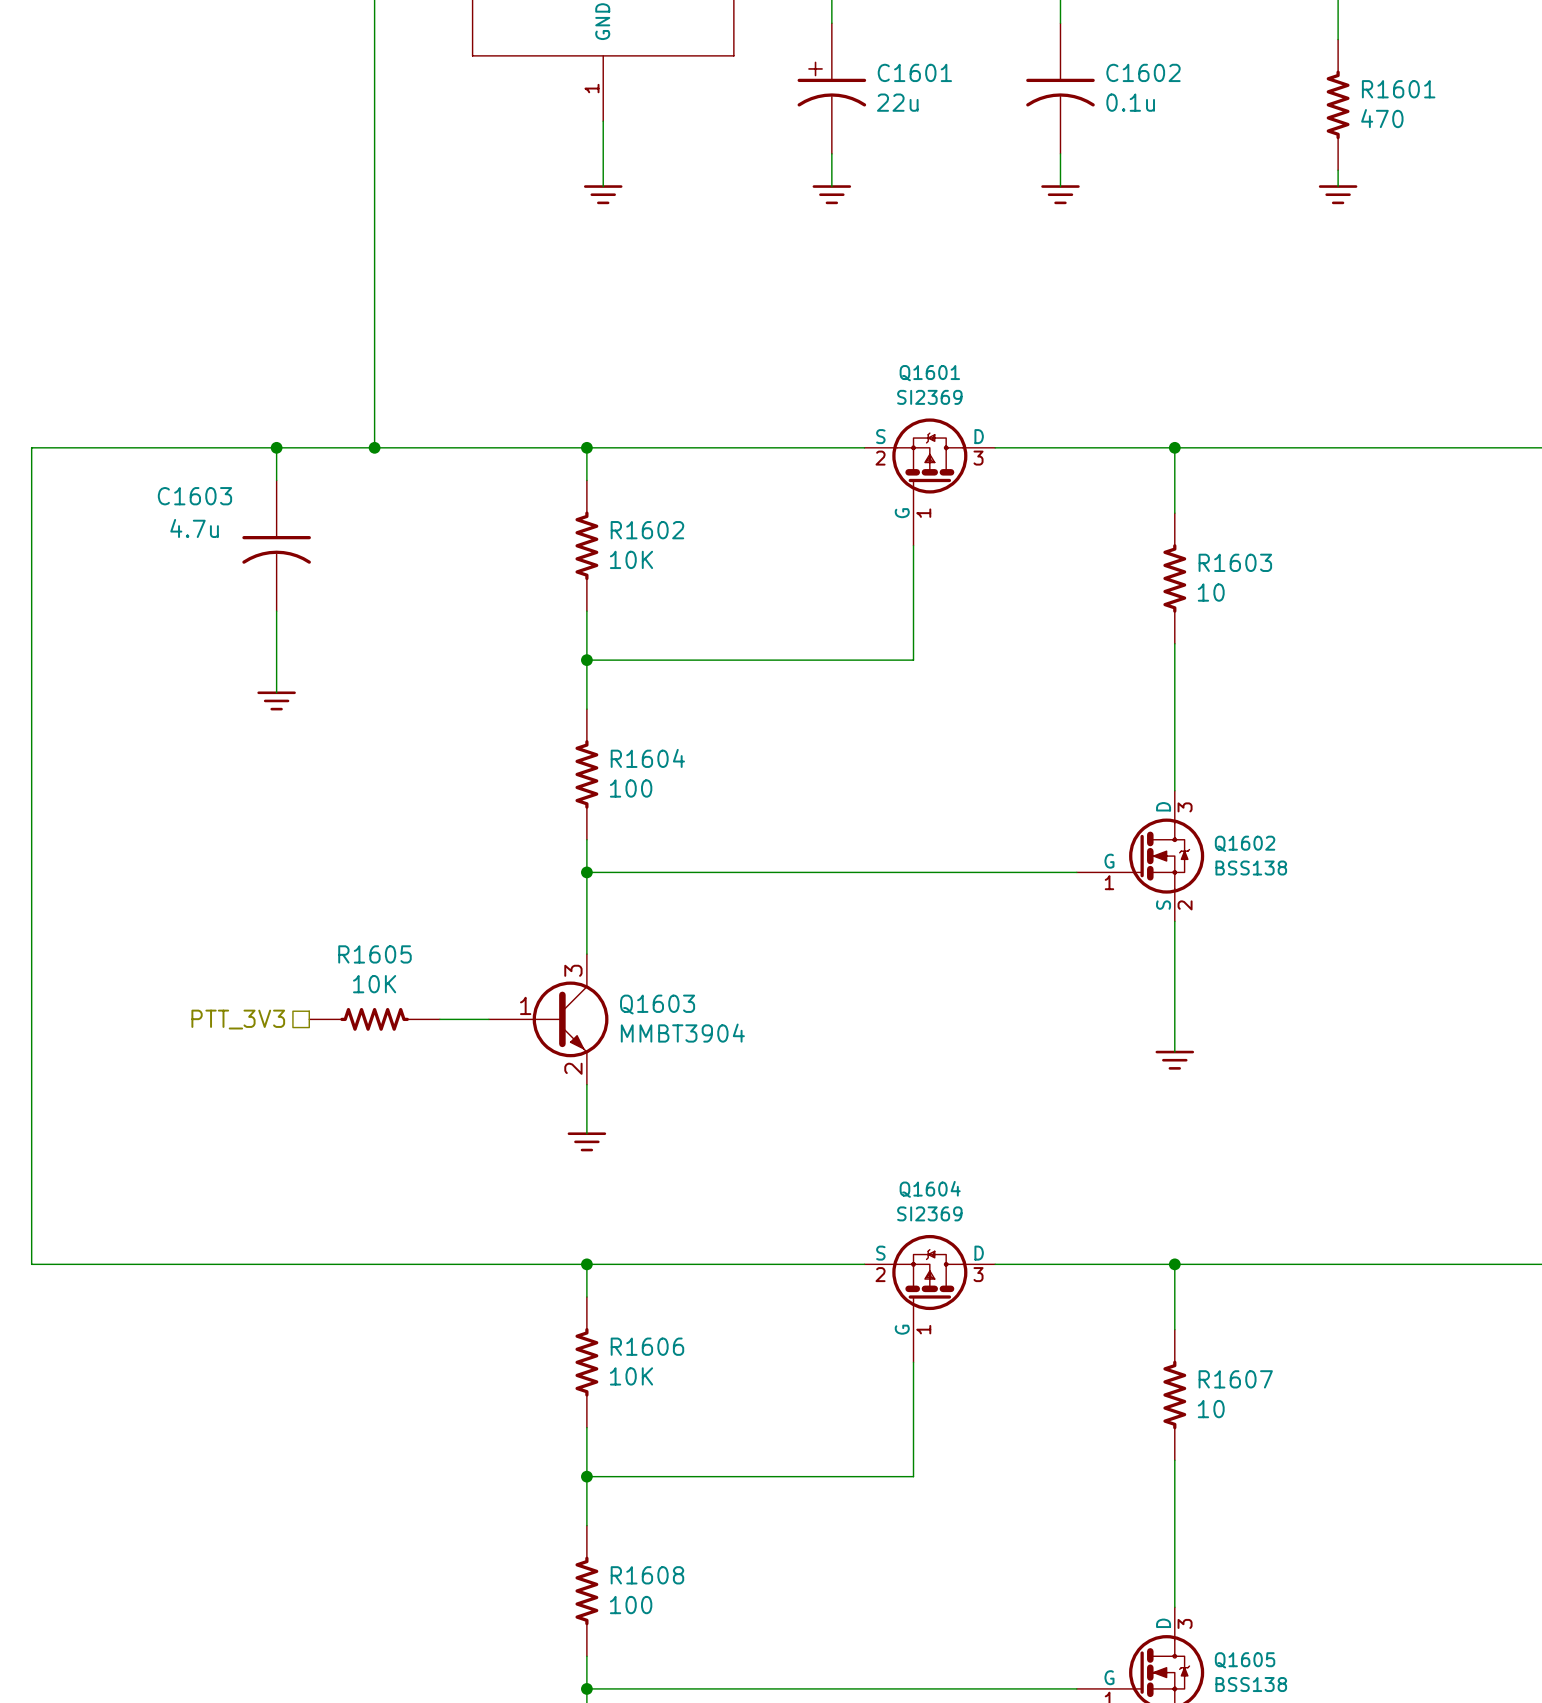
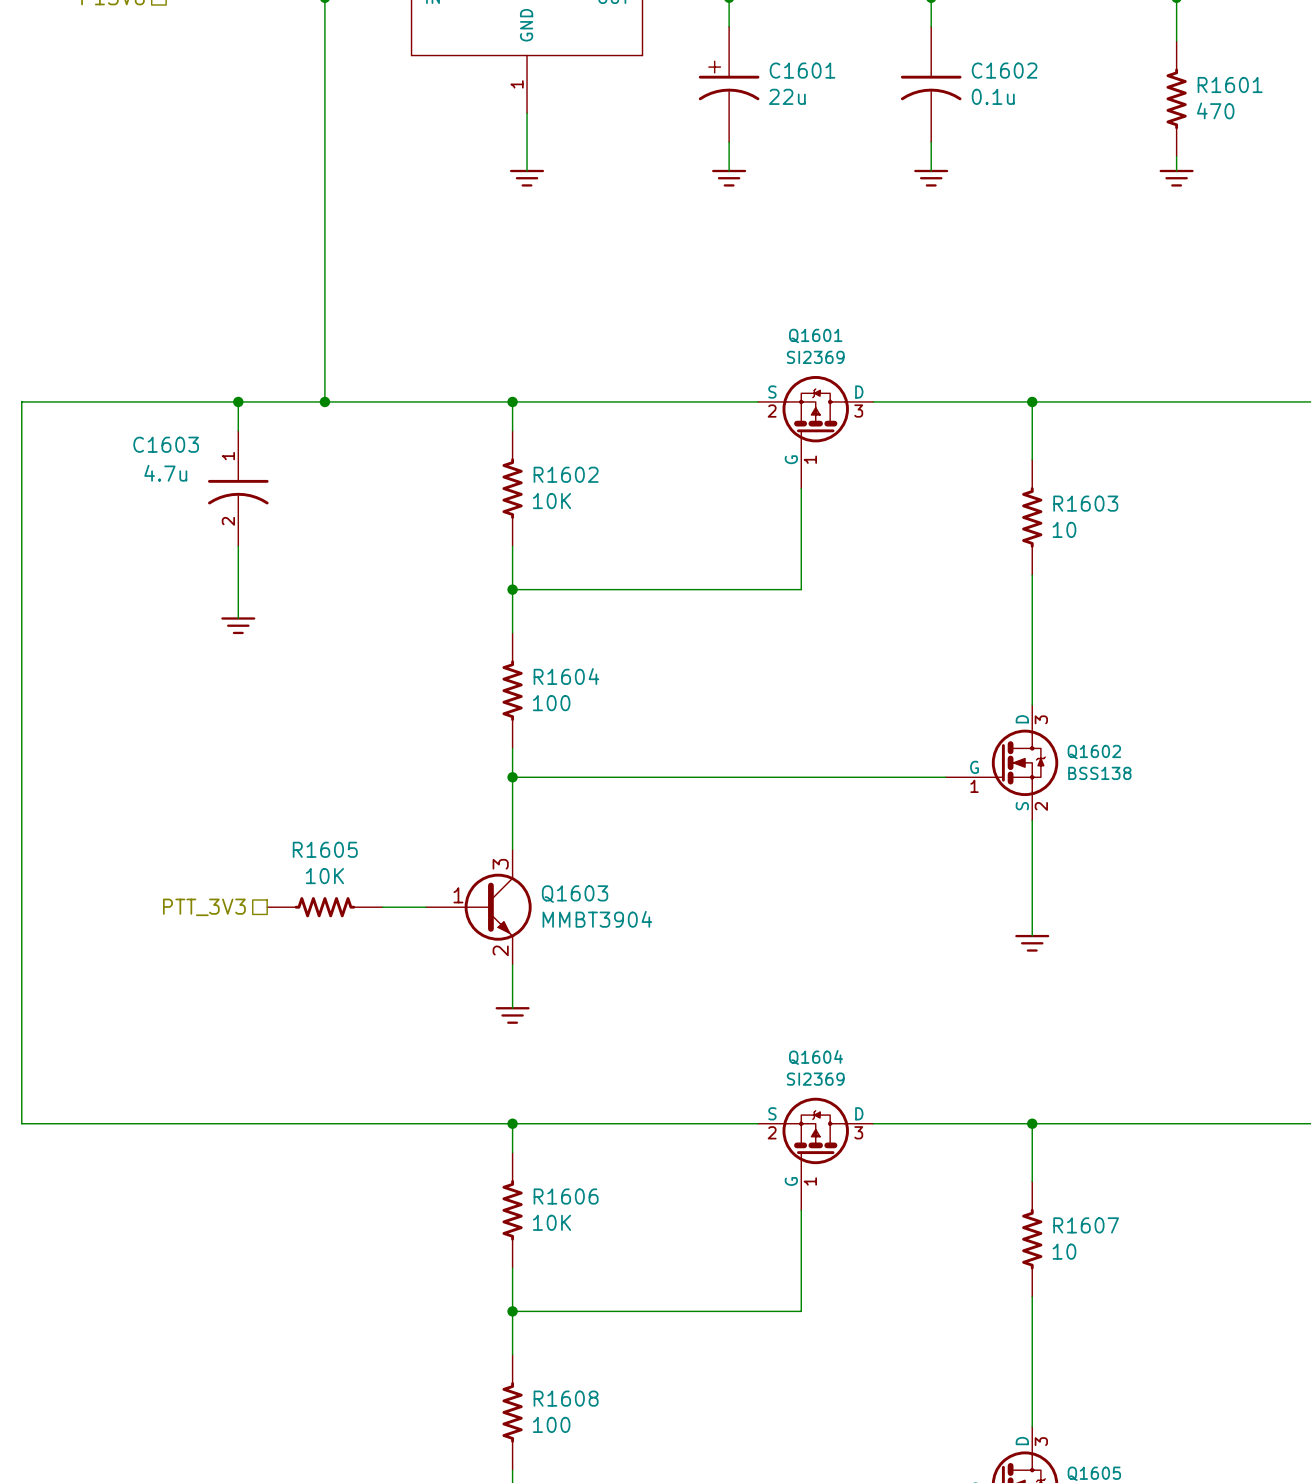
C1603 pin number: none -> 1 (228, 456)
C1603 pin number: none -> 2 (228, 521)

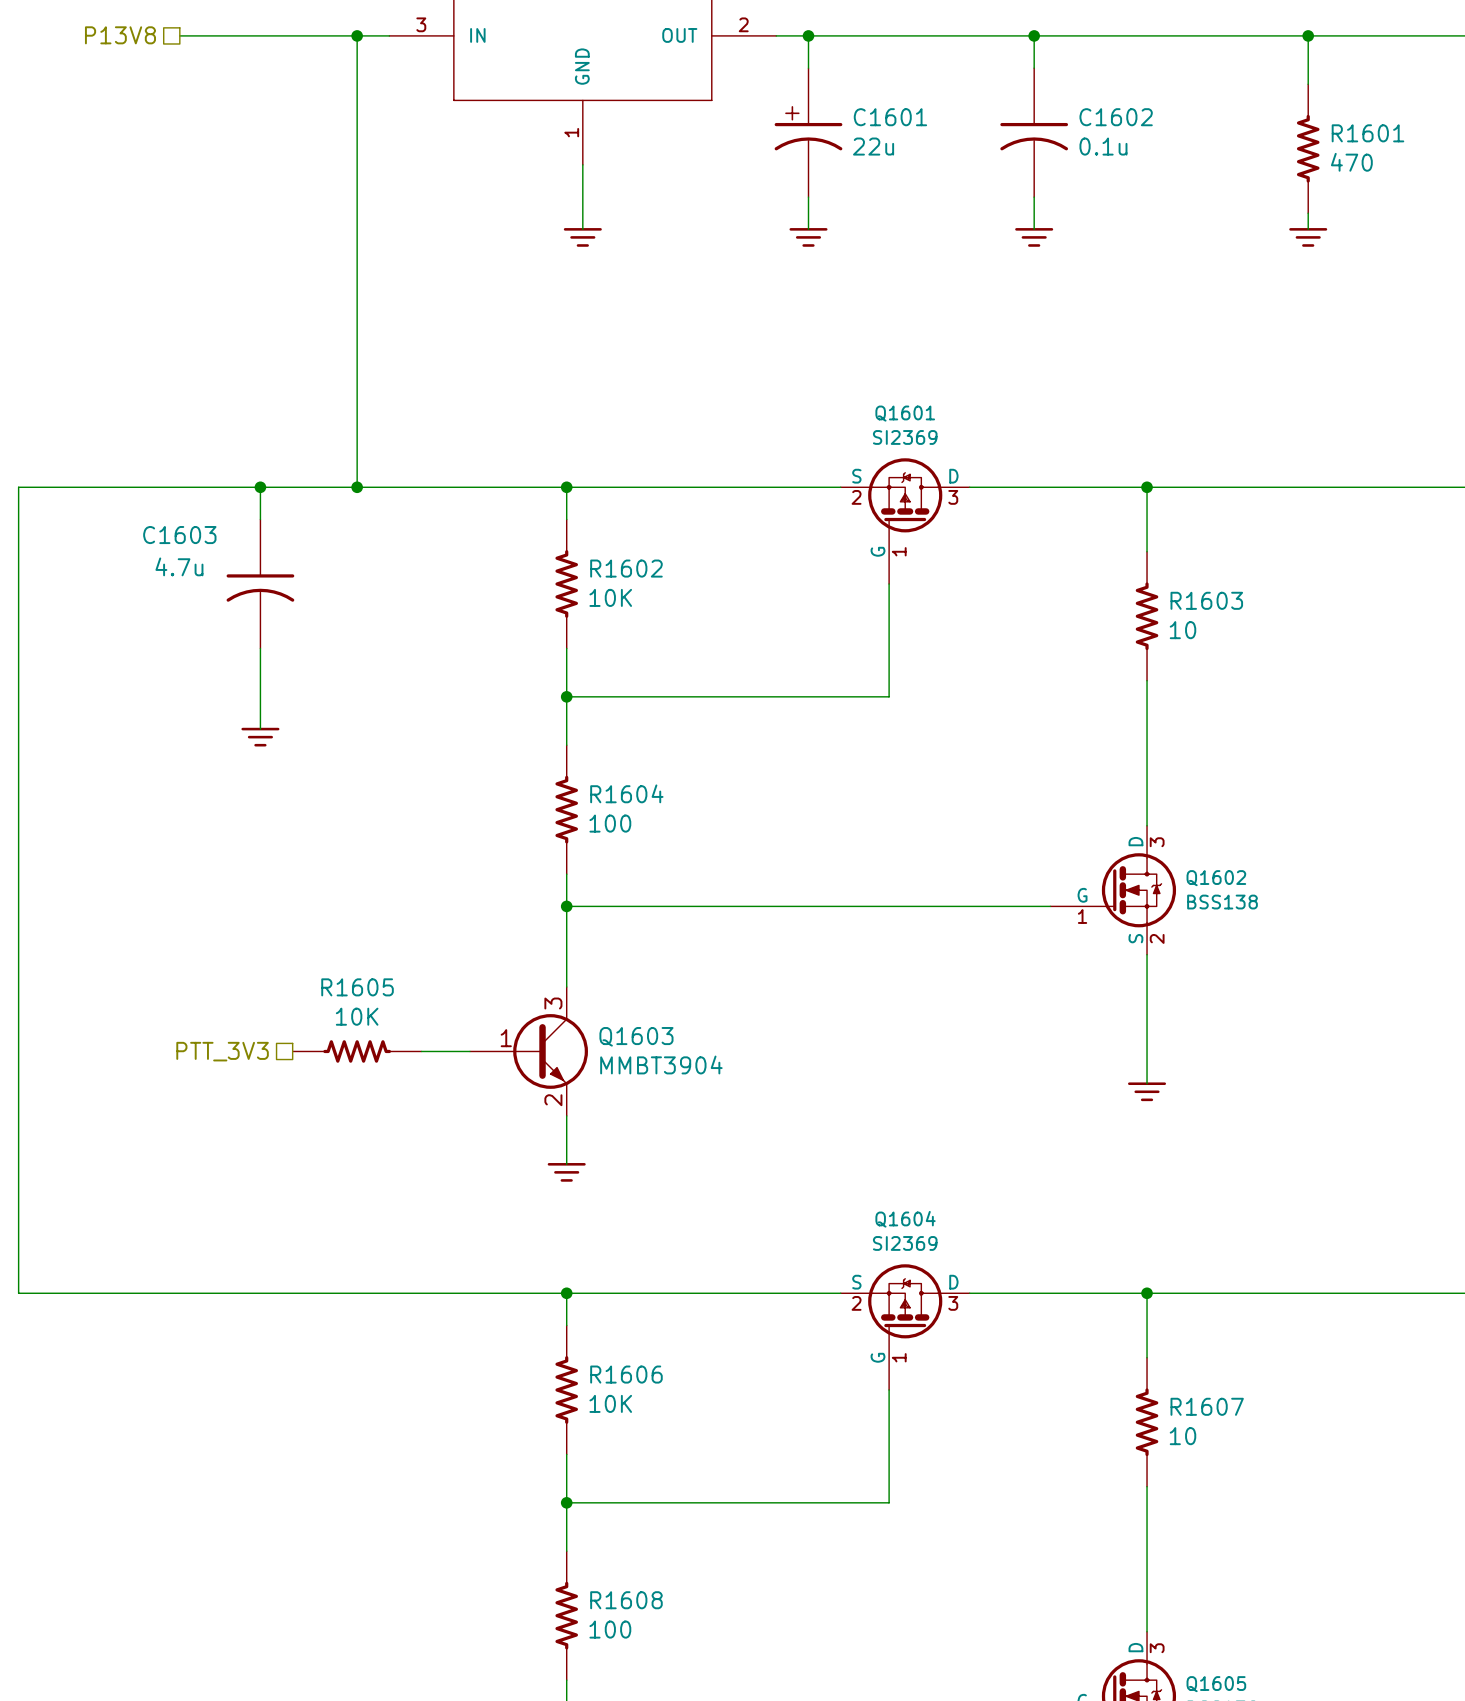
C1603 pin number: 1 (228, 456) -> none
C1603 pin number: 2 (228, 521) -> none

